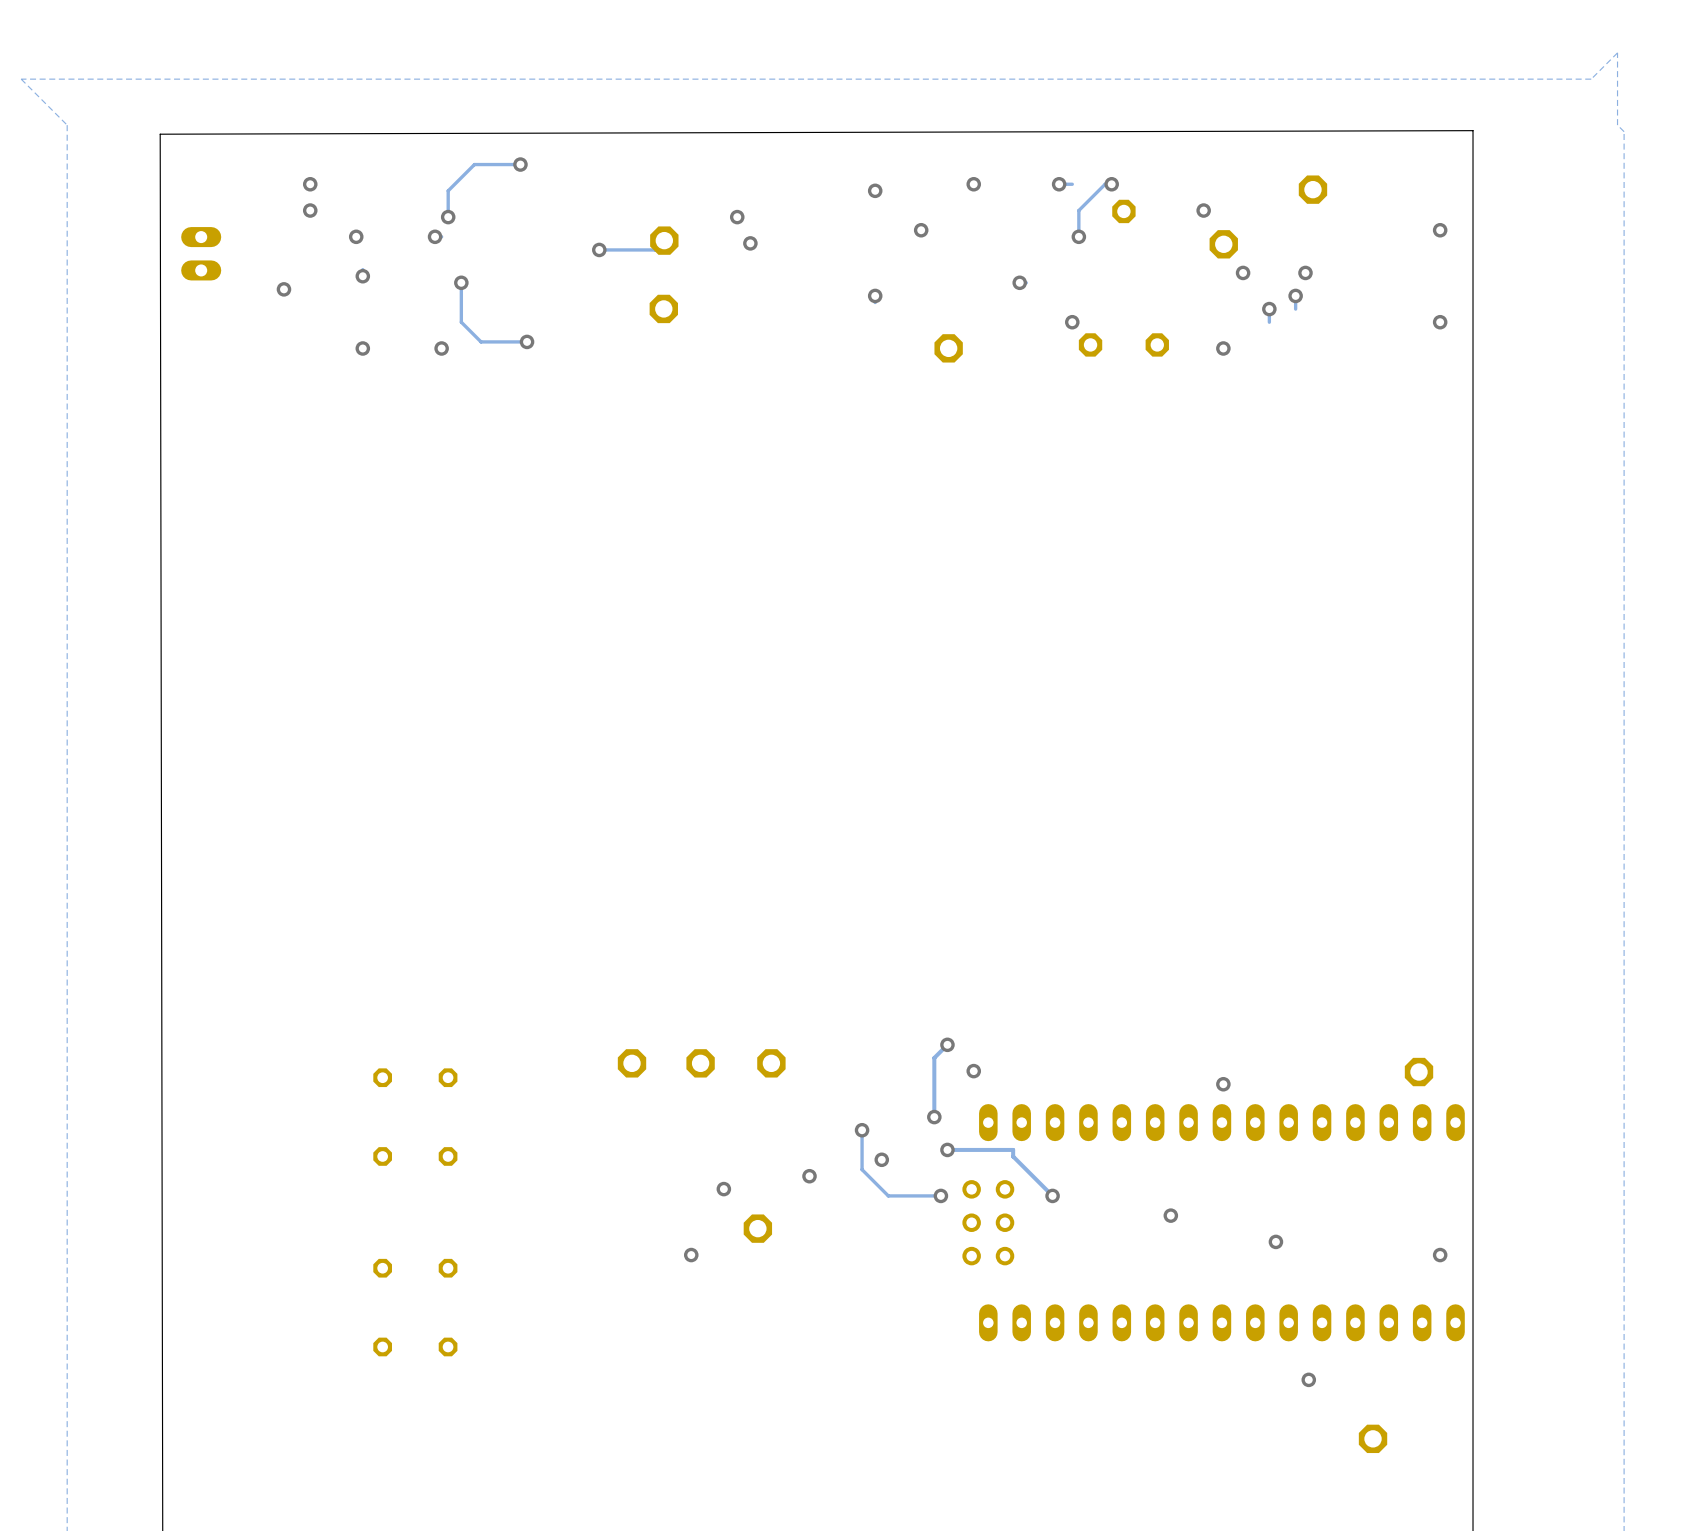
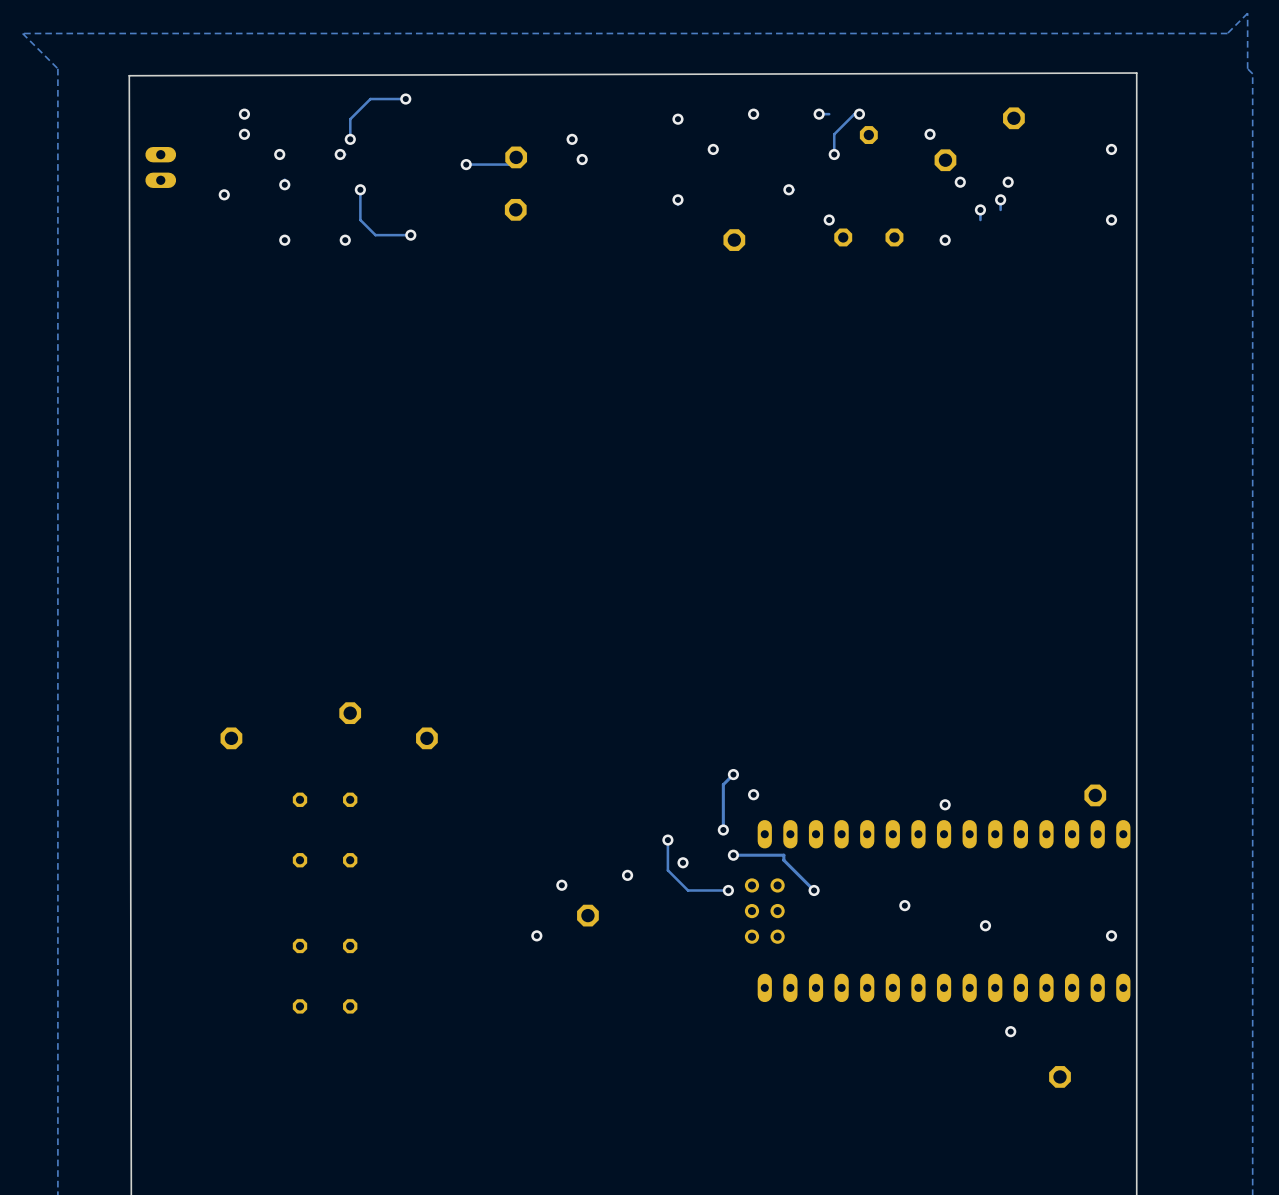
part: none -> (350, 713)
part: none -> (231, 738)
part: none -> (426, 738)
part: (632, 1063) -> none
part: (700, 1063) -> none
part: (771, 1063) -> none

